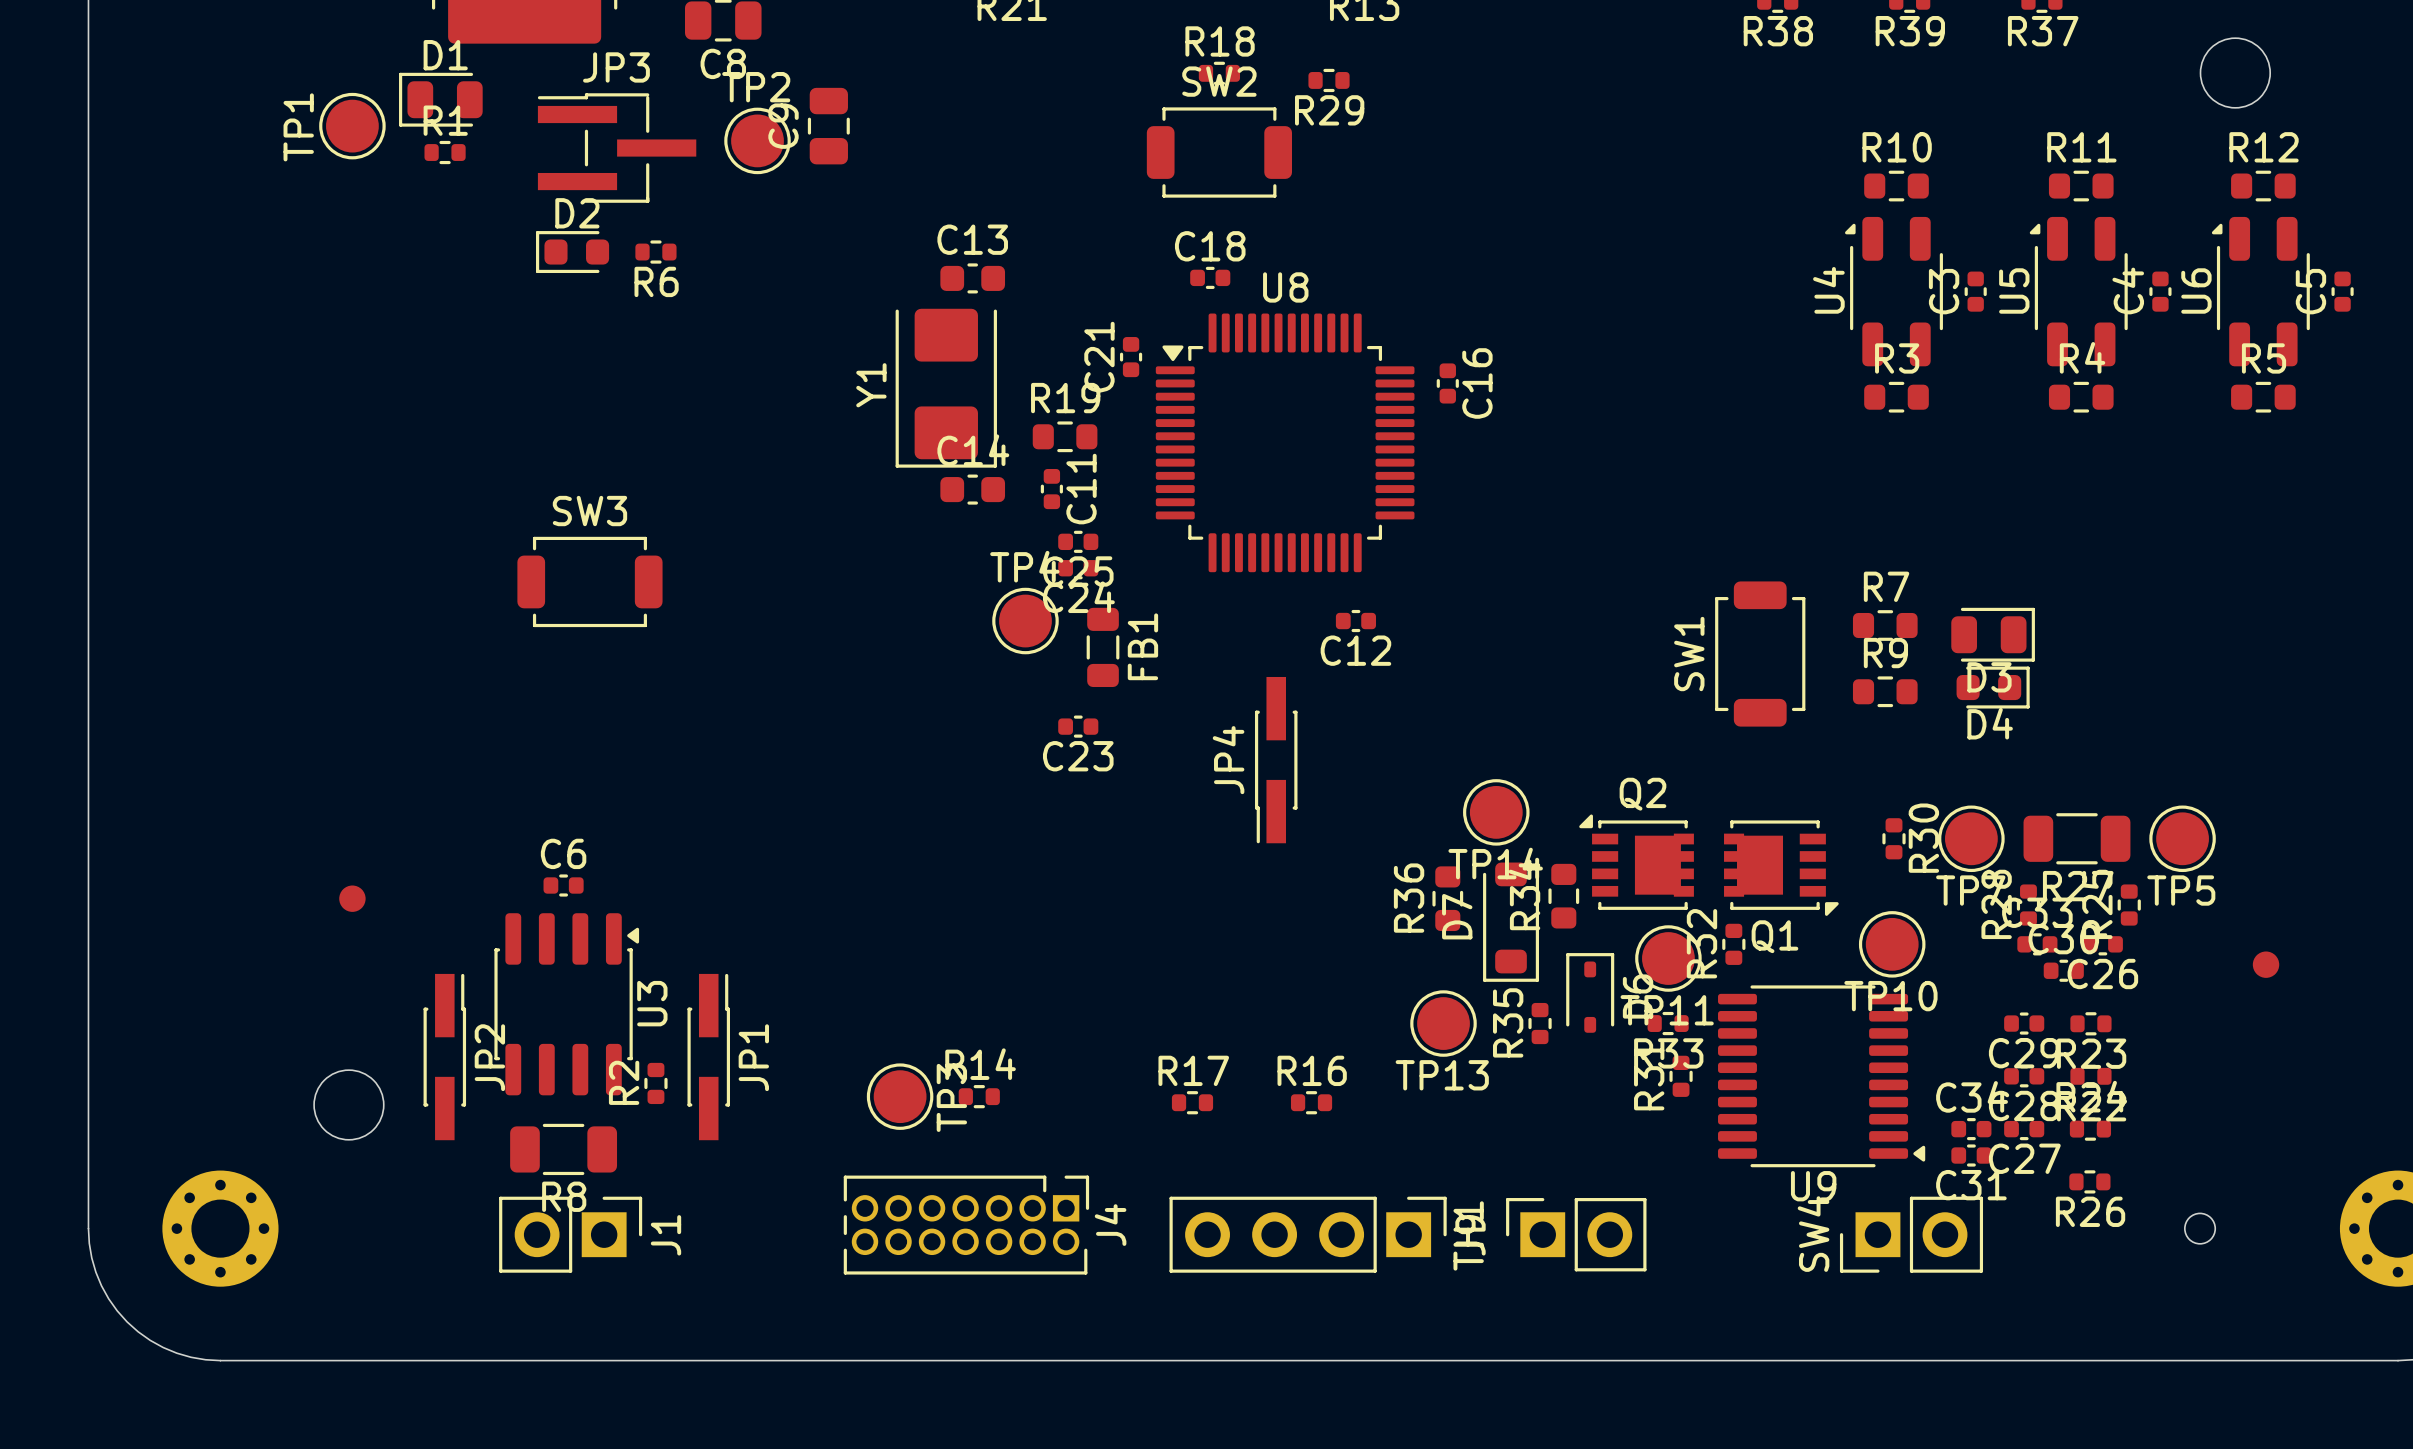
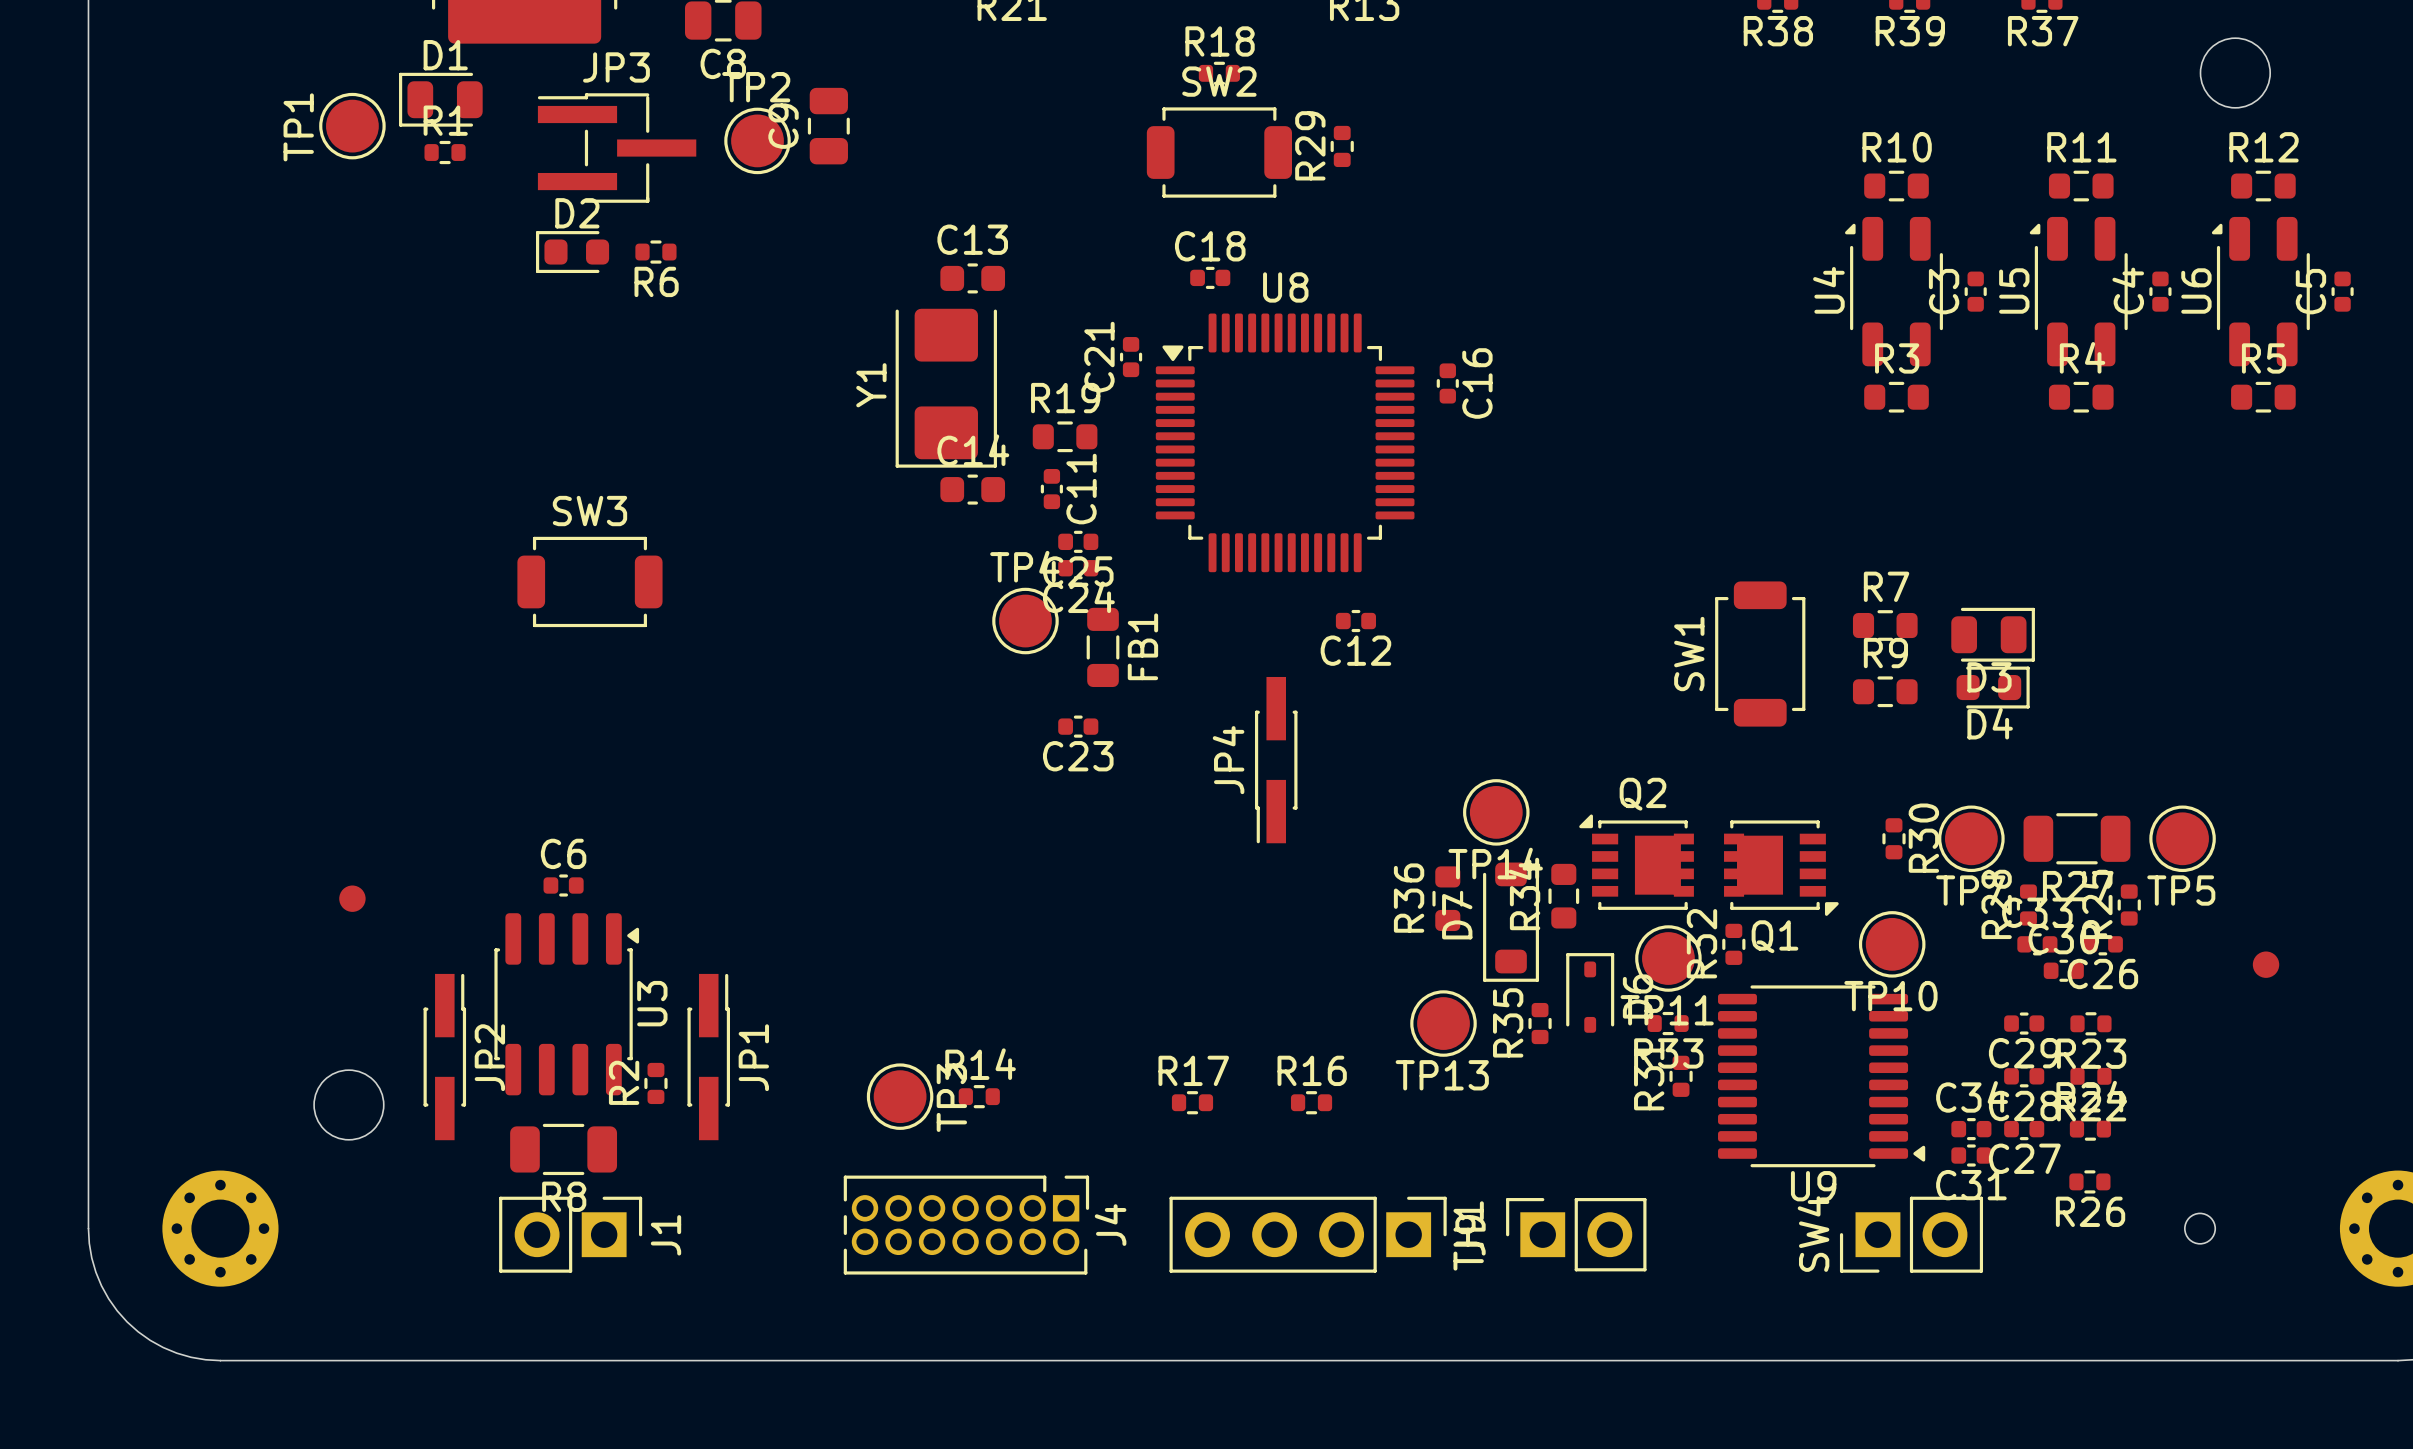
R29 rotation: 0° (1329, 80) -> 90° clockwise (1342, 146)
R29 position: (1329, 80) -> (1342, 146)

